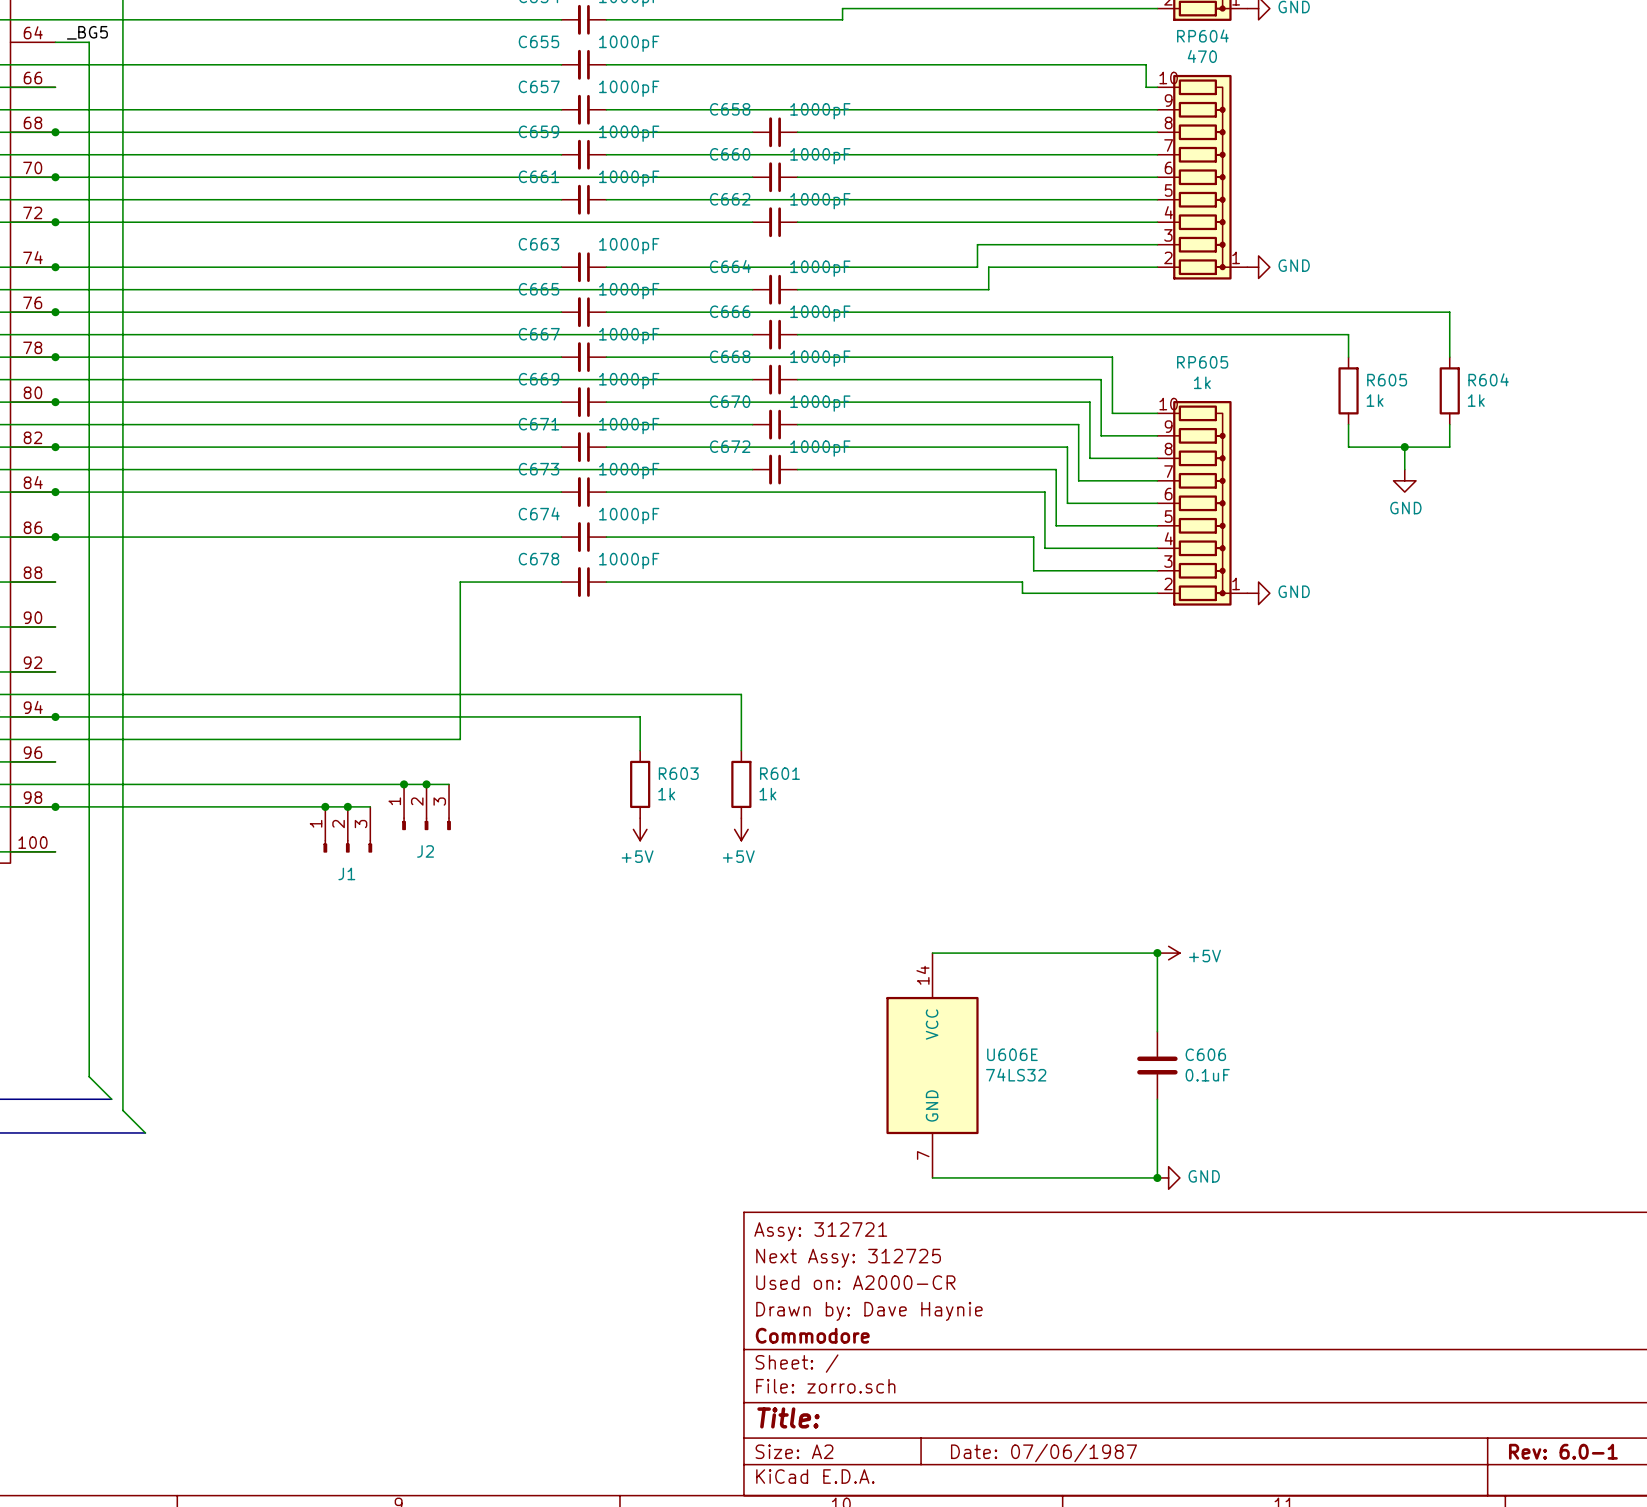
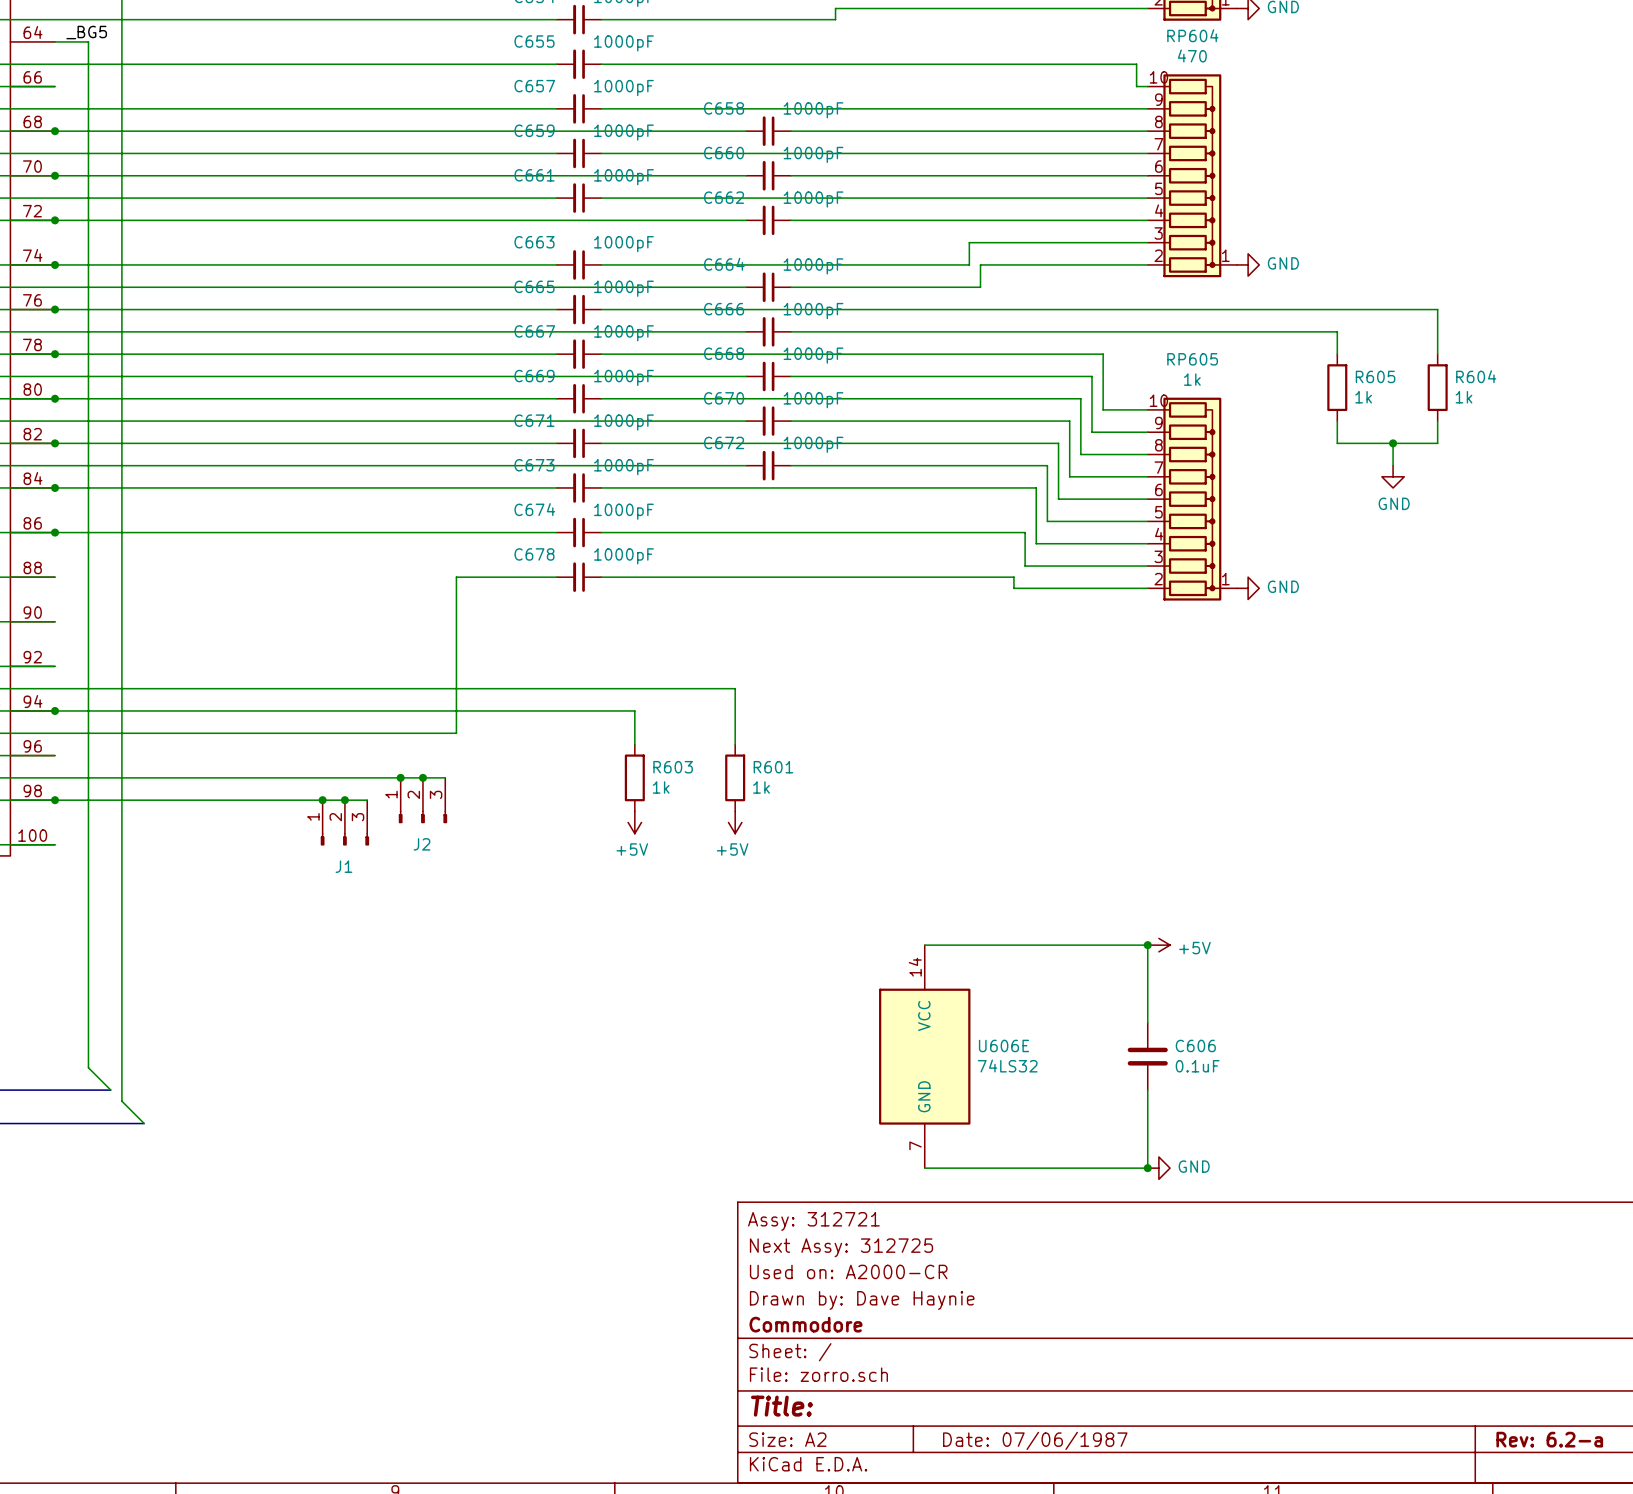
title block: Rev: 6.0-1 (1563, 1451) -> Rev: 6.2-a (1549, 1439)

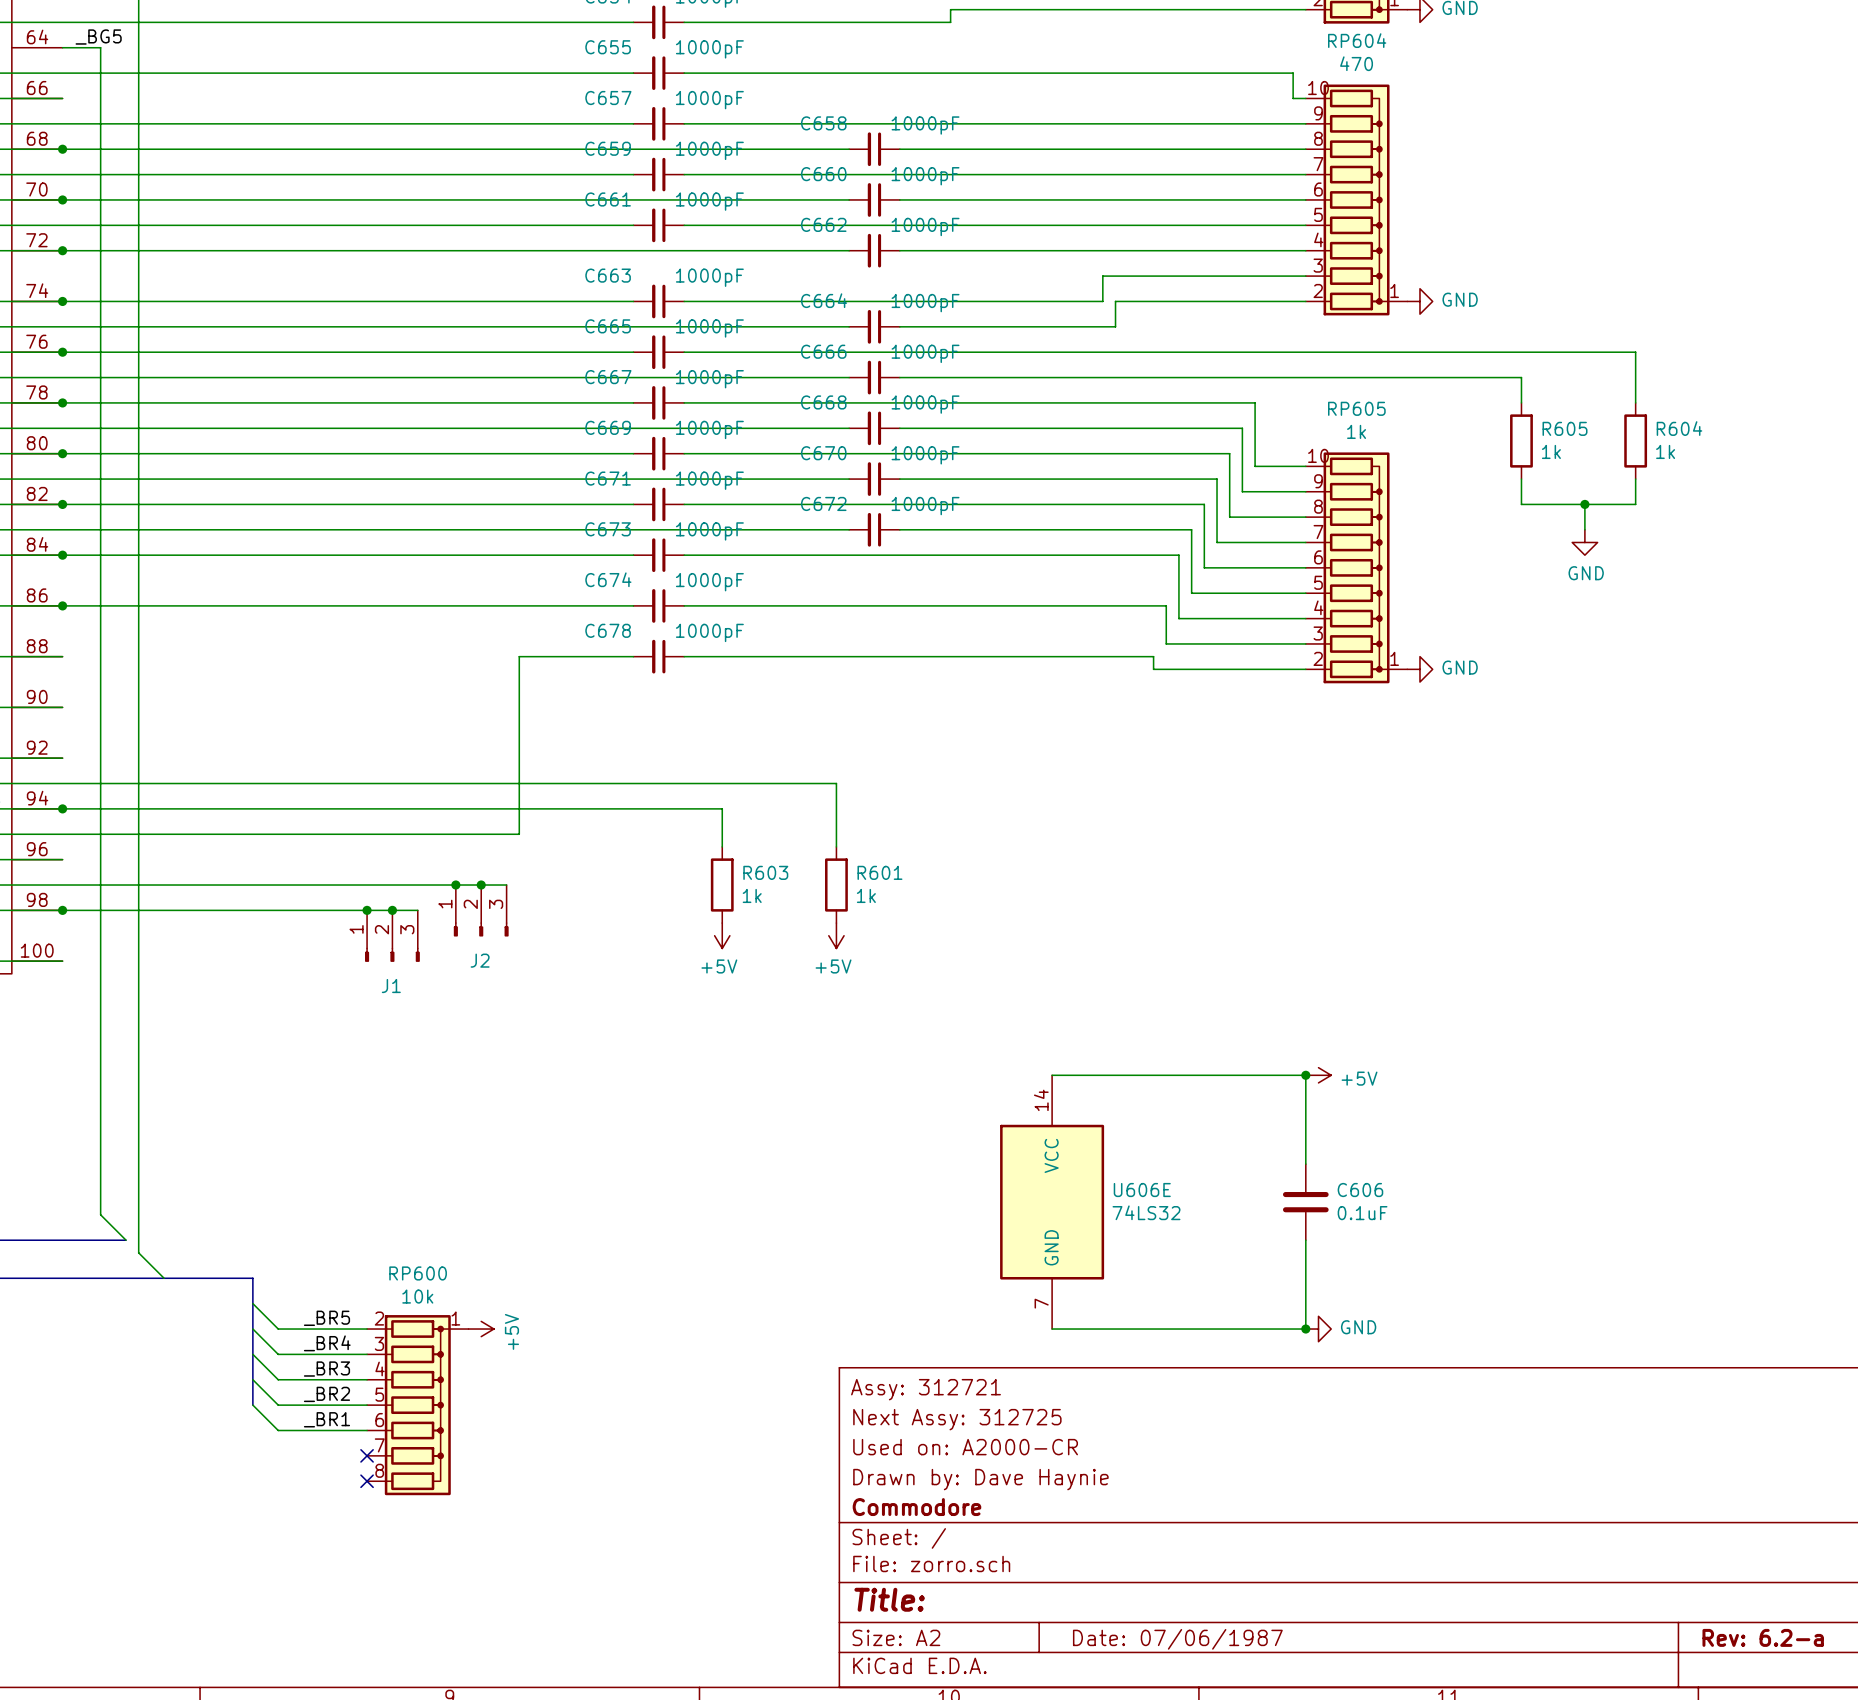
bus: none -> (164, 1278) (252, 1278) (252, 1405)
wire: none -> (252, 1303) (278, 1329) (367, 1329)
label: none -> _BR5 (326, 1318)
wire: none -> (252, 1329) (278, 1354) (367, 1354)
power symbol: none -> +5V (481, 1329)
label: none -> _BR4 (327, 1343)
wire: none -> (252, 1354) (278, 1379) (367, 1379)
label: none -> _BR3 (326, 1369)
wire: none -> (252, 1379) (278, 1405) (367, 1405)
label: none -> _BR2 (326, 1394)
wire: none -> (252, 1405) (278, 1430) (367, 1430)
RP600: none -> 10k (417, 1405)
label: none -> _BR1 (326, 1419)
no-connect mark: none -> (367, 1455)
no-connect mark: none -> (367, 1481)

